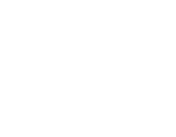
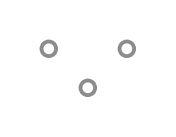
part: none -> (87, 68)

